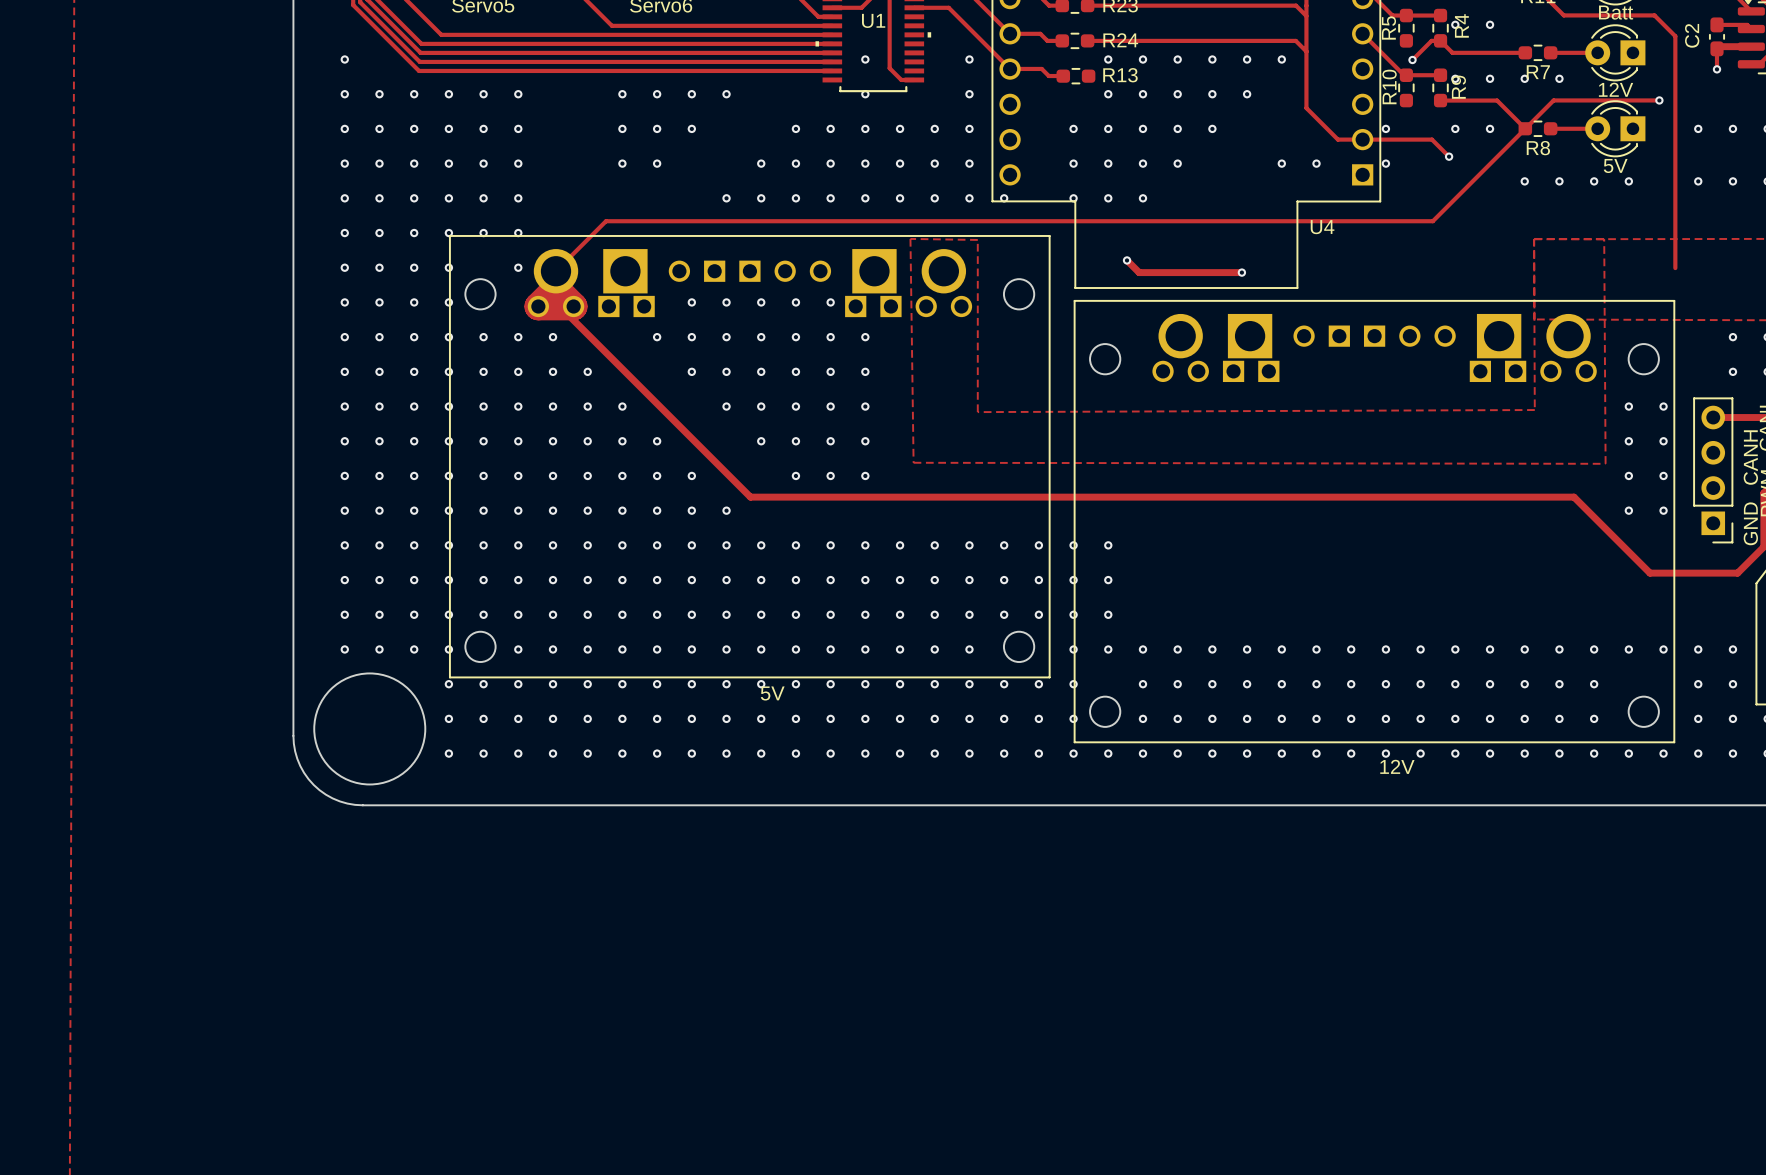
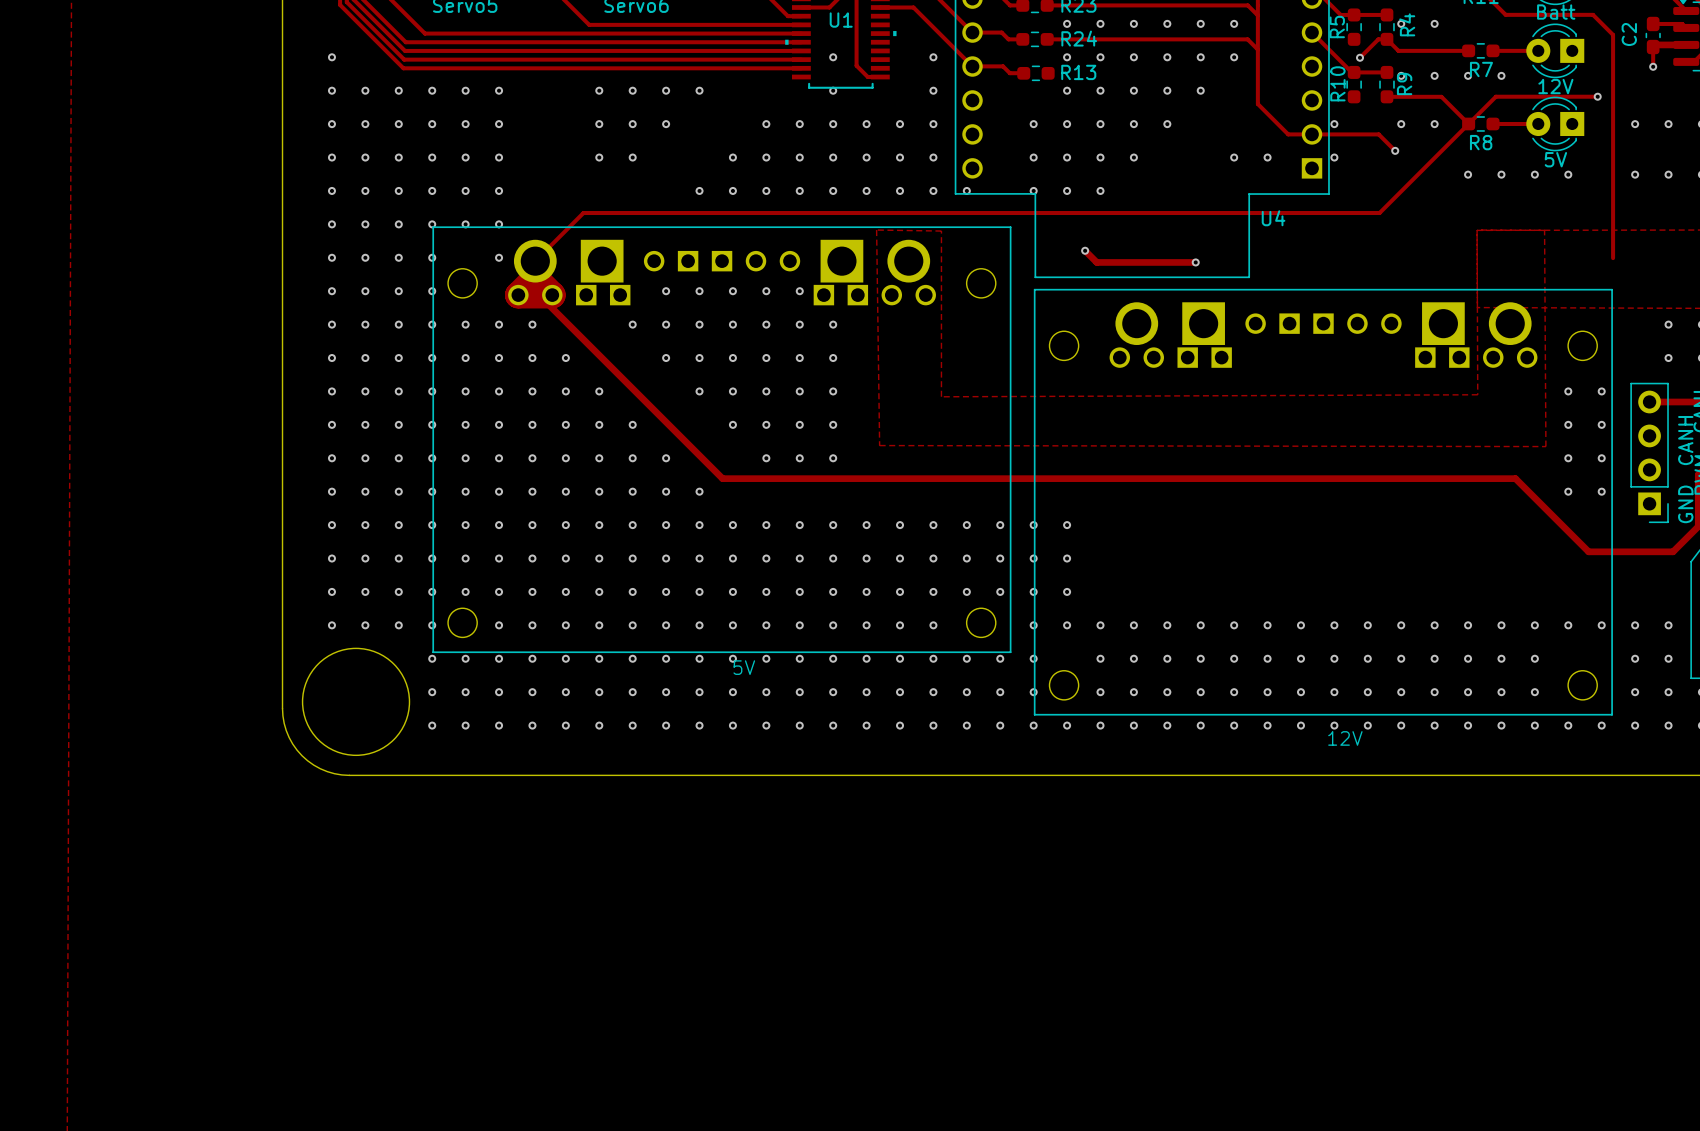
via: none -> (1067, 23)
via: none -> (1100, 23)
via: none -> (1133, 23)
via: none -> (1167, 23)
via: none -> (1200, 23)
via: none -> (1234, 23)

